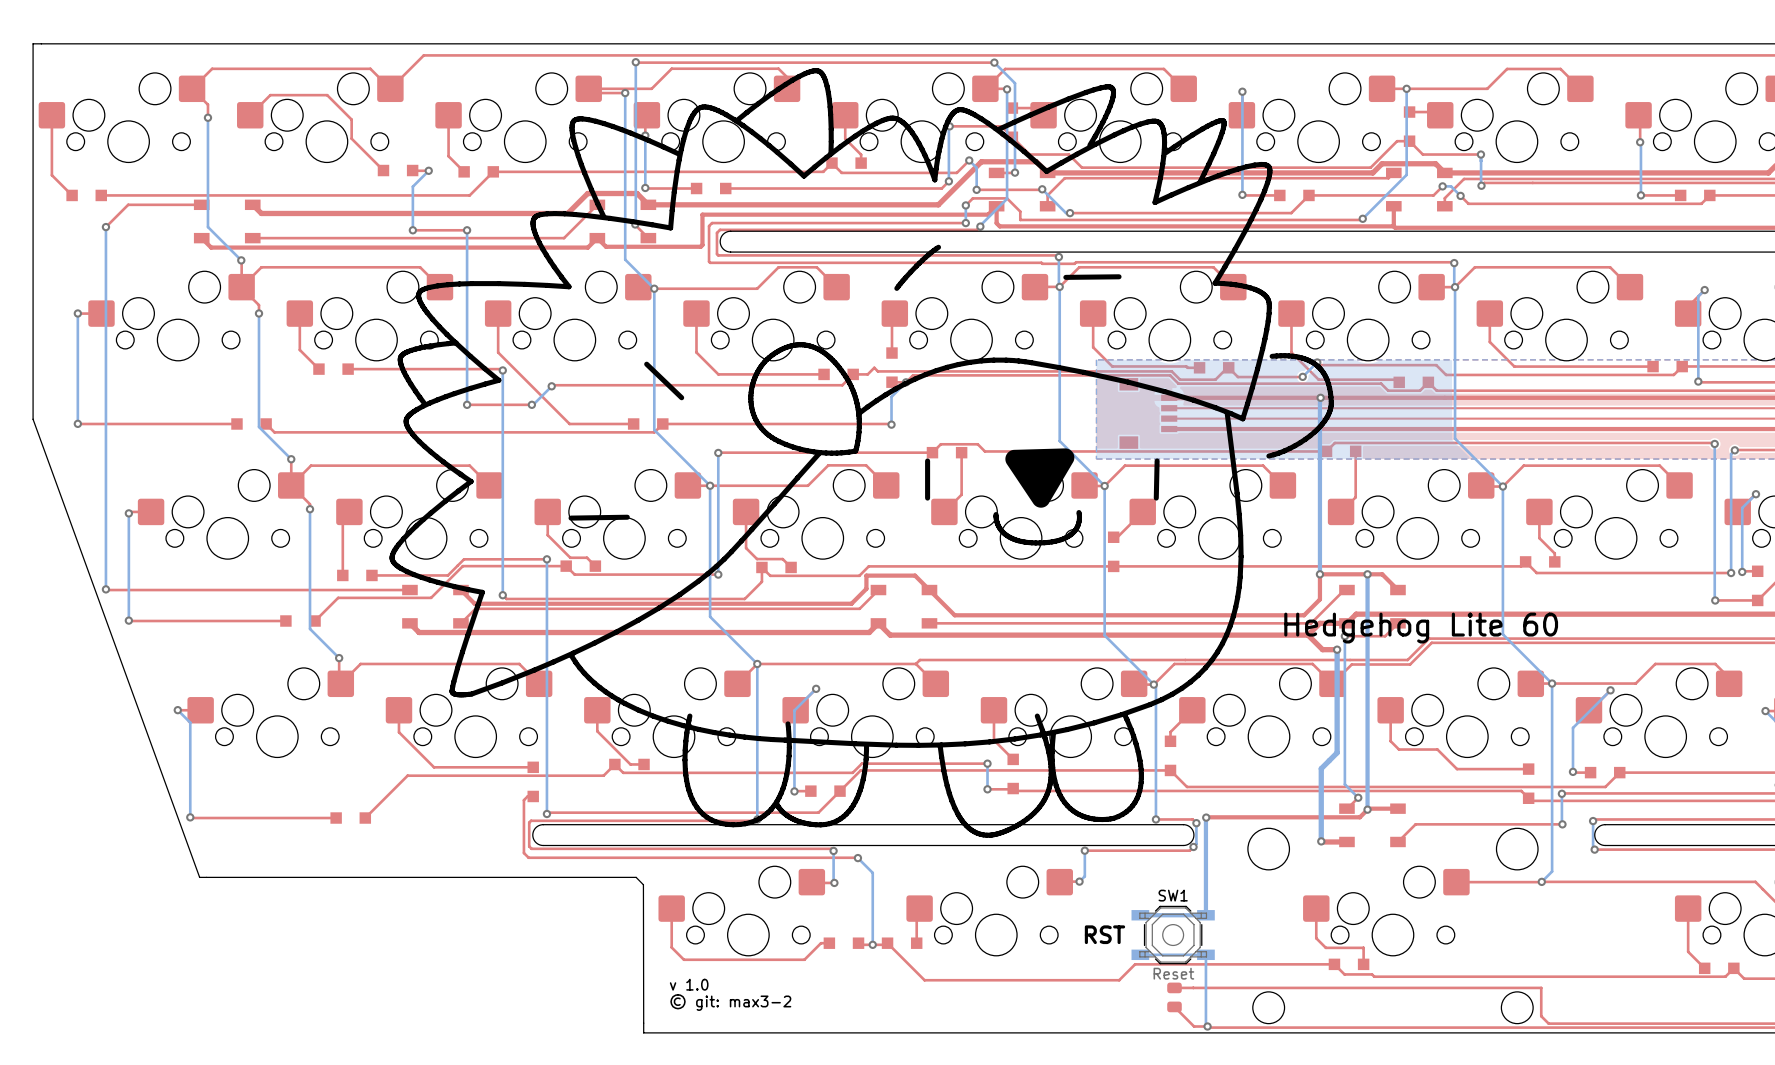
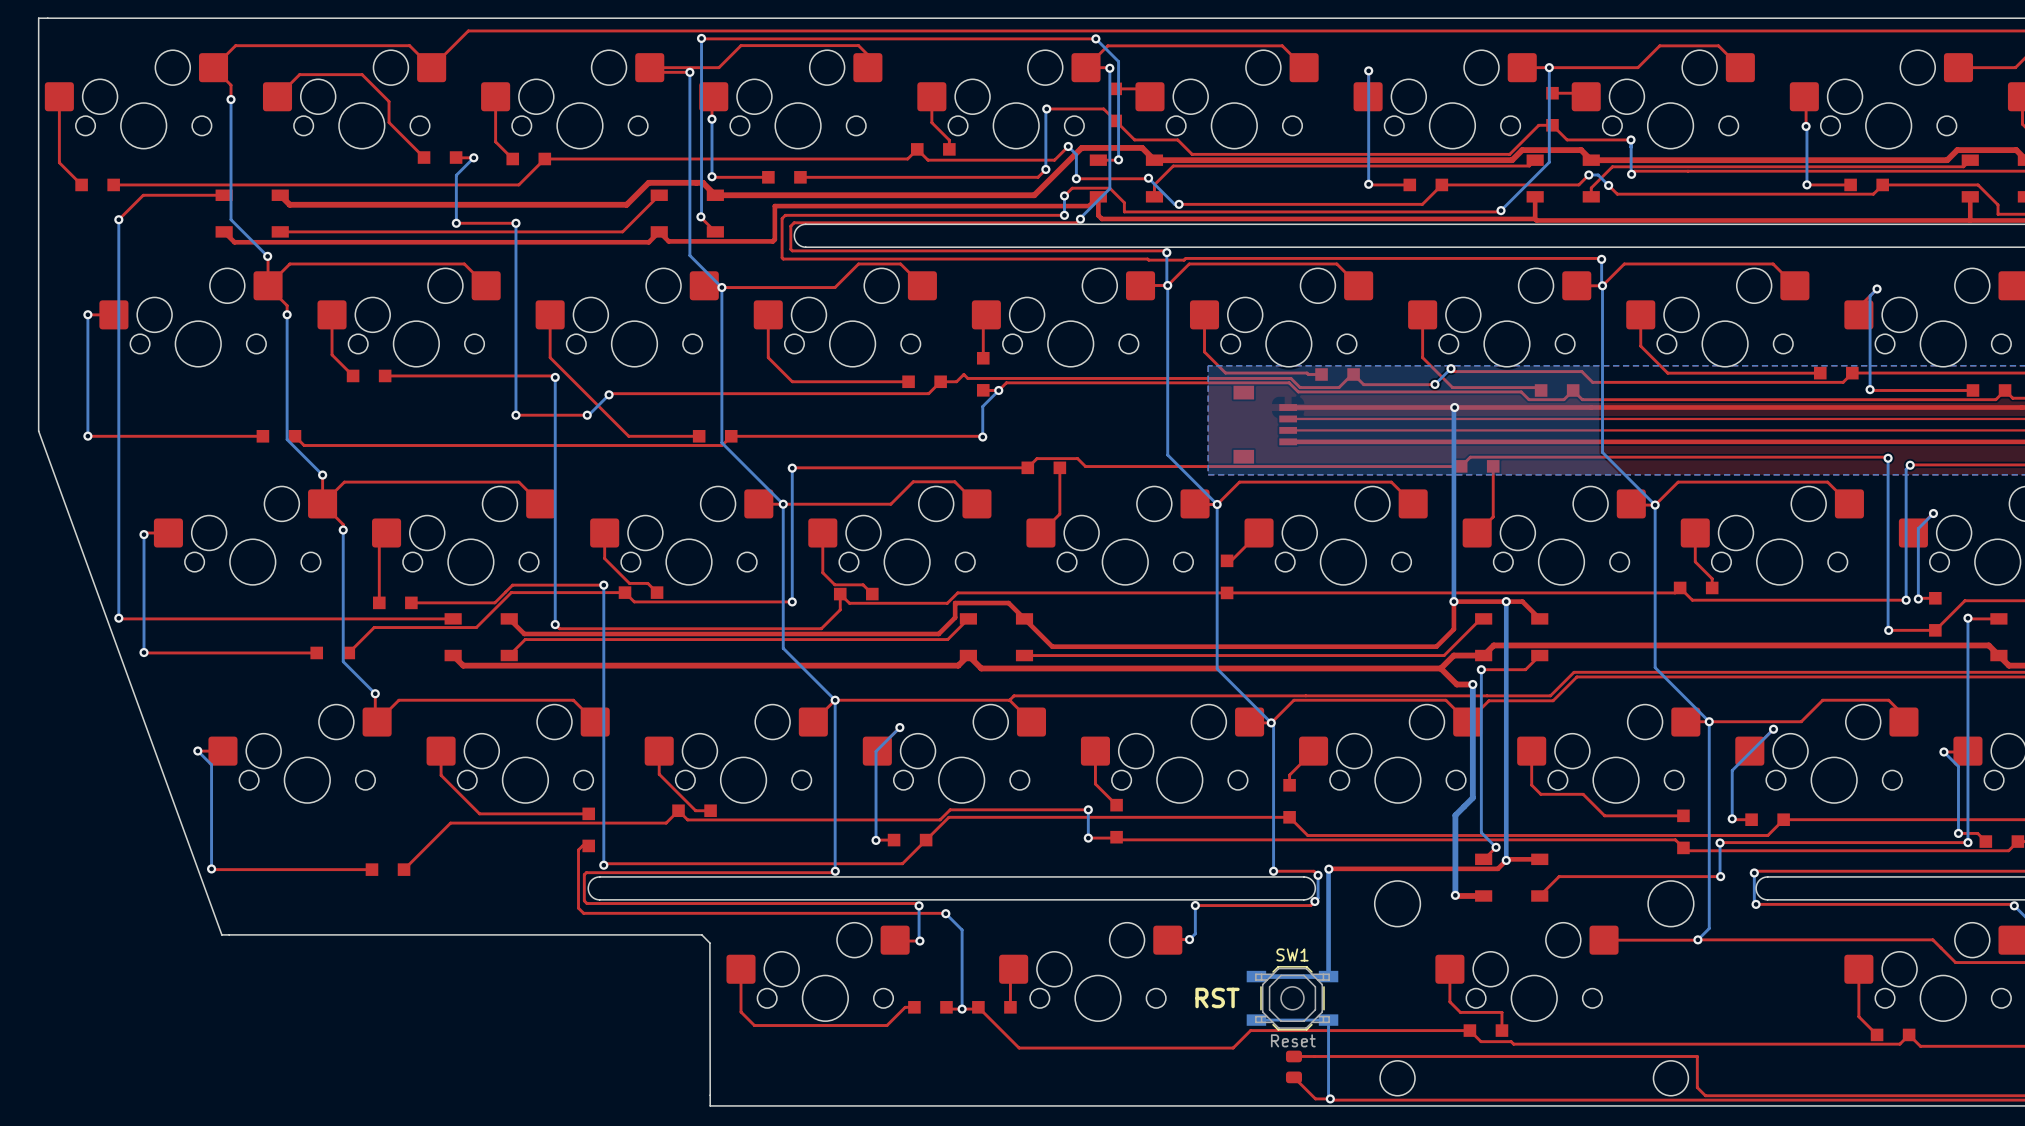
line: (736, 120) (792, 80) (807, 72) (818, 71) (824, 78) (828, 92) (830, 153) -> none
line: (998, 129) (1068, 99) (1100, 87) (1111, 87) (1113, 93) (1110, 106) (1089, 145) -> none
line: (1165, 152) (1207, 126) (1223, 120) (1220, 137) (1199, 182) -> none
line: (678, 153) (603, 123) (582, 118) (574, 120) (572, 130) (575, 147) (604, 217) -> none
line: (938, 247) (919, 263) (896, 288) -> none
line: (1119, 276) (1065, 277) -> none
line: (456, 342) (415, 349) (400, 356) (404, 372) (424, 403) -> none
line: (802, 344) (790, 346) (778, 351) (766, 359) (759, 369) (752, 383) (750, 395) (751, 408) (755, 419) (768, 435) (793, 447) (826, 453) (855, 451) (859, 432) (858, 415) (856, 400) (849, 383) (839, 367) (828, 356) (816, 348) (802, 344) -> none
line: (1272, 356) (1299, 357) (1316, 365) (1326, 379) (1331, 403) (1325, 419) (1310, 435) (1289, 448) (1268, 456) -> none
line: (646, 364) (681, 397) -> none
line: (859, 413) (895, 389) (936, 370) (969, 362) (1006, 360) (1058, 367) (1128, 382) (1193, 400) (1242, 418) (1264, 339) (1268, 301) (1264, 294) (1254, 289) (1235, 284) (1215, 283) (1260, 199) (1268, 178) (1268, 166) (1261, 164) (1238, 169) (1155, 202) (1164, 149) (1163, 130) (1158, 122) (1147, 122) (1123, 130) (1046, 171) (988, 123) (971, 113) (959, 109) (951, 114) (945, 126) (938, 151) (934, 179) (924, 154) (912, 132) (902, 122) (892, 118) (882, 120) (862, 131) (803, 176) (769, 145) (734, 119) (714, 109) (700, 107) (691, 118) (683, 139) (677, 171) (670, 227) (586, 215) (540, 214) (533, 220) (535, 234) (546, 255) (569, 286) (459, 283) (429, 287) (419, 292) (420, 303) (432, 319) (454, 342) (498, 380) (437, 399) (416, 409) (406, 418) (407, 427) (419, 441) (471, 481) (409, 532) (394, 549) (392, 560) (401, 568) (421, 577) (482, 592) (452, 690) (456, 694) (472, 693) (534, 670) (594, 642) (638, 620) (679, 594) (724, 559) (819, 453) -> none
line: (1227, 413) (1240, 535) (1240, 577) (1233, 616) (1222, 643) (1205, 667) (1181, 688) (1150, 704) (1067, 729) (989, 741) (896, 745) (758, 738) (699, 729) (668, 721) (638, 710) (599, 687) (584, 673) (571, 656) -> none
drawing: [1005, 448, 1075, 508] -> none
line: (927, 460) (927, 498) -> none
line: (1157, 460) (1156, 498) -> none
line: (1078, 512) (1078, 524) (1071, 534) (1058, 540) (1040, 542) (1021, 541) (1007, 535) (998, 526) (996, 514) -> none
line: (627, 517) (571, 518) -> none
text: Hedgehog Lite 60 (1421, 628) -> none
line: (689, 716) (684, 760) (690, 794) (703, 814) (716, 821) (726, 824) (739, 824) (755, 820) (767, 812) (776, 801) (784, 784) (788, 765) (787, 723) -> none
line: (1037, 716) (1050, 759) (1051, 777) (1048, 791) (1041, 803) (1030, 815) (1016, 825) (999, 833) (986, 835) (977, 833) (968, 828) (960, 817) (947, 785) (940, 746) -> none
line: (1125, 716) (1138, 751) (1141, 782) (1138, 794) (1132, 805) (1122, 814) (1113, 818) (1097, 819) (1085, 817) (1073, 810) (1064, 802) (1057, 790) (1053, 774) (1053, 734) -> none
line: (866, 746) (864, 772) (860, 790) (851, 808) (840, 818) (825, 824) (805, 823) (788, 816) (777, 804) -> none
text: v 1.0 (689, 984) -> none
text: © git: max3-2 (730, 1002) -> none

